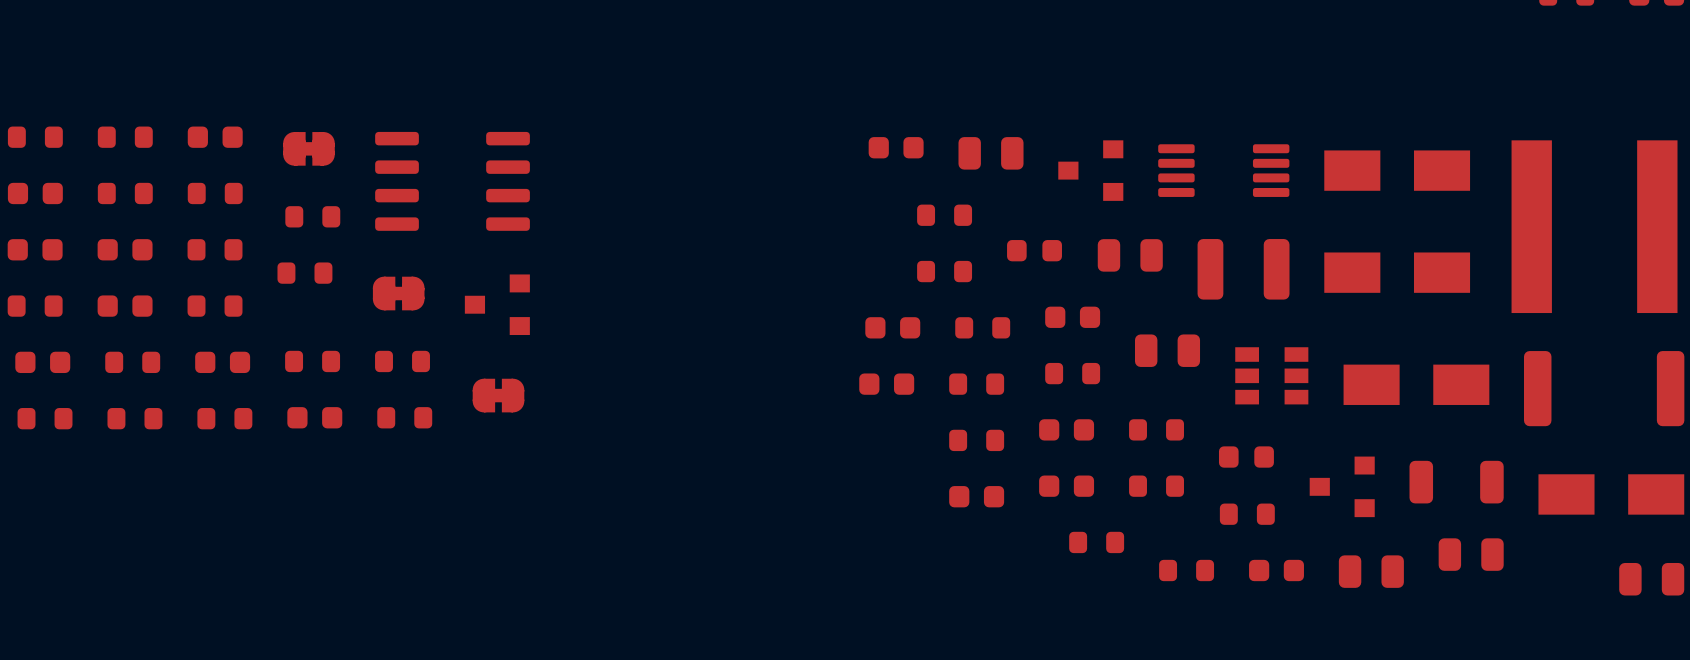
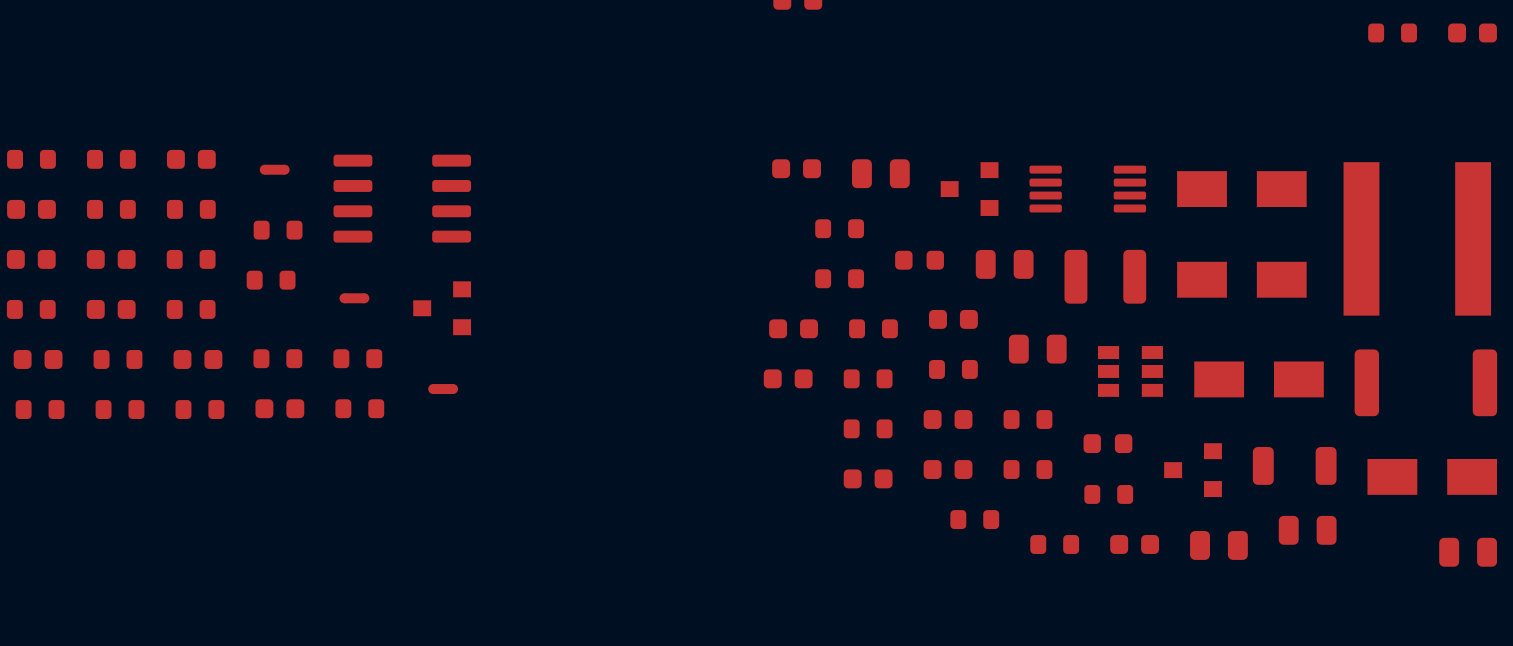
part footprint: [283, 132, 335, 166] -> [259, 164, 290, 175]
part footprint: [372, 276, 425, 311] -> [339, 293, 370, 304]
part footprint: [472, 378, 525, 413] -> [428, 384, 459, 394]

